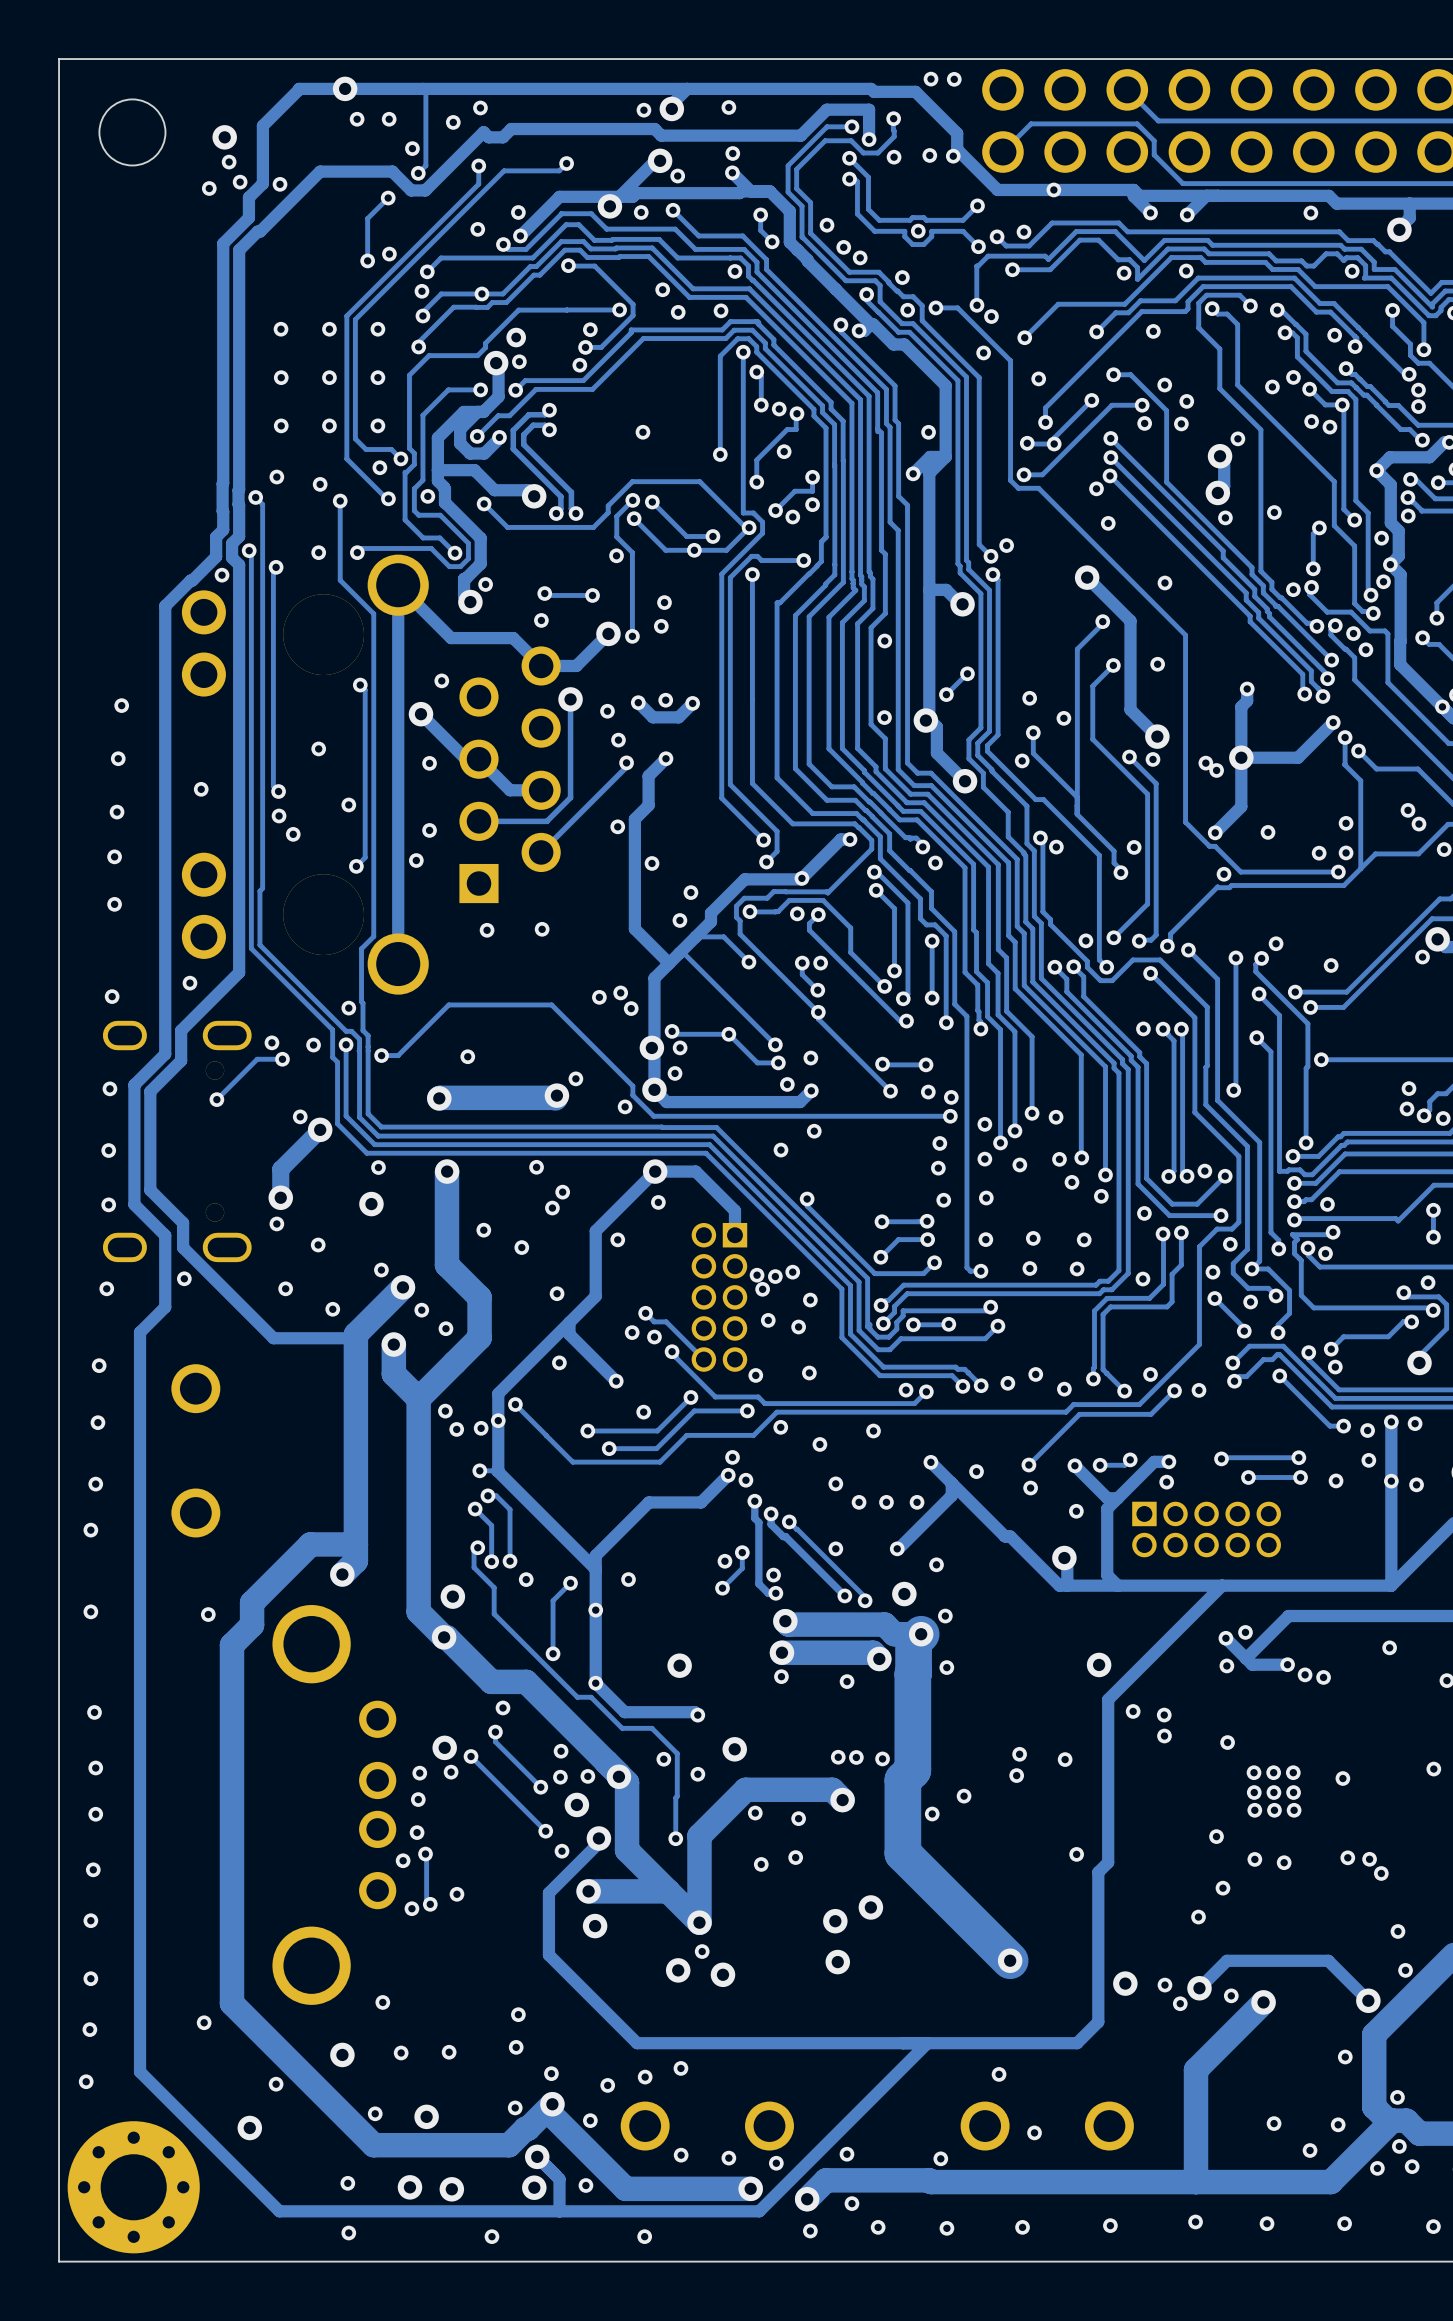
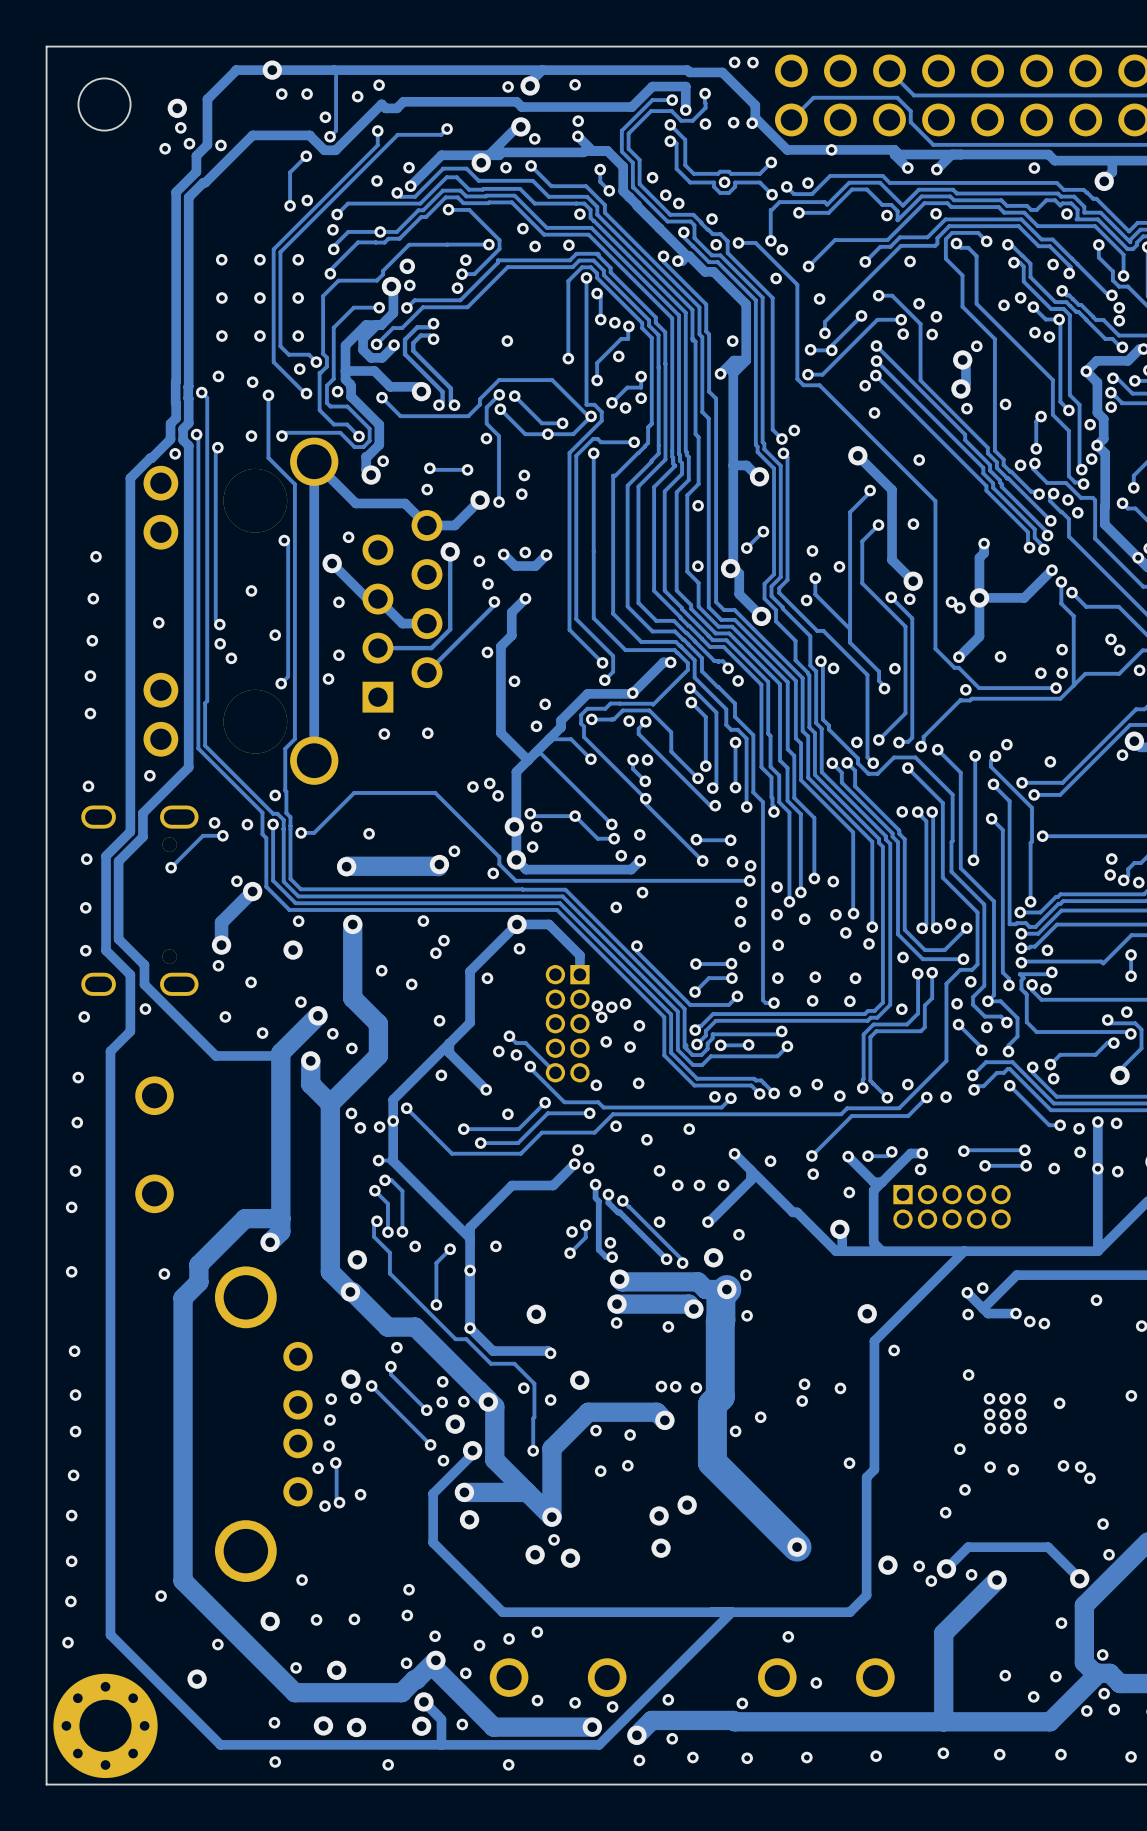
via: (1164, 1715) -> none
via: (1164, 1736) -> none

